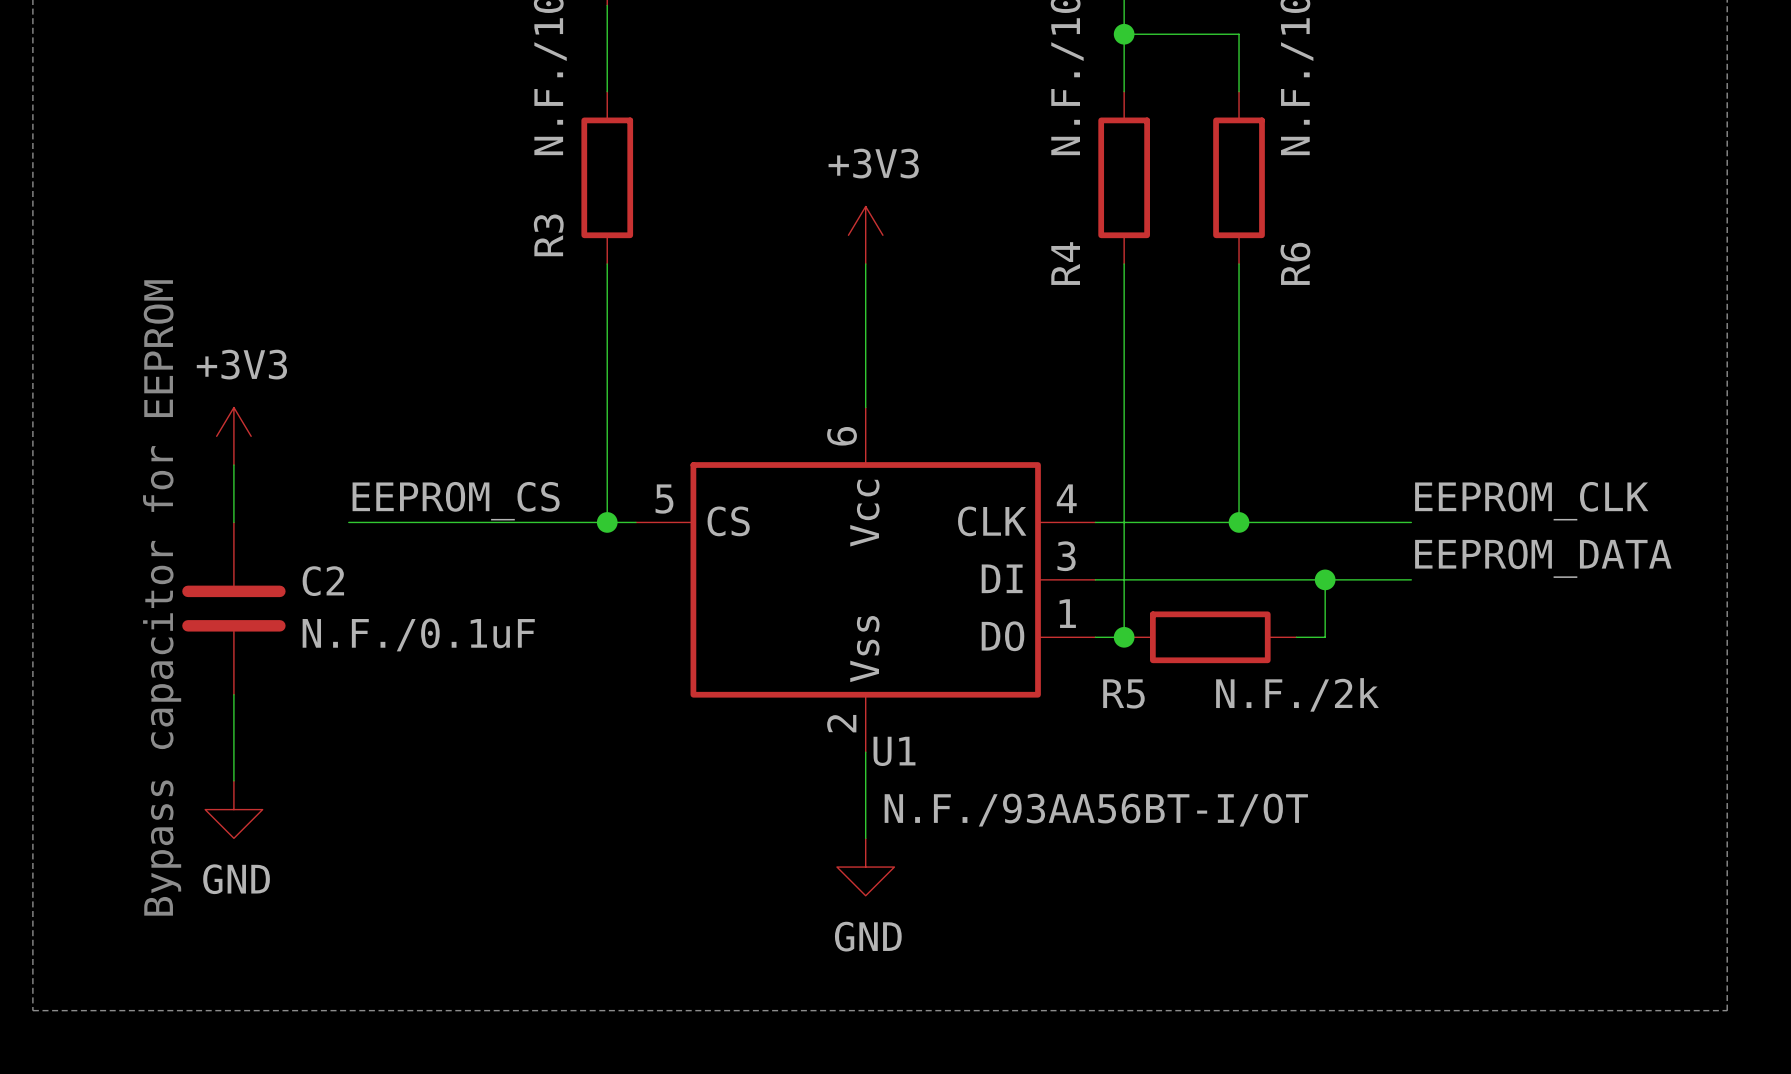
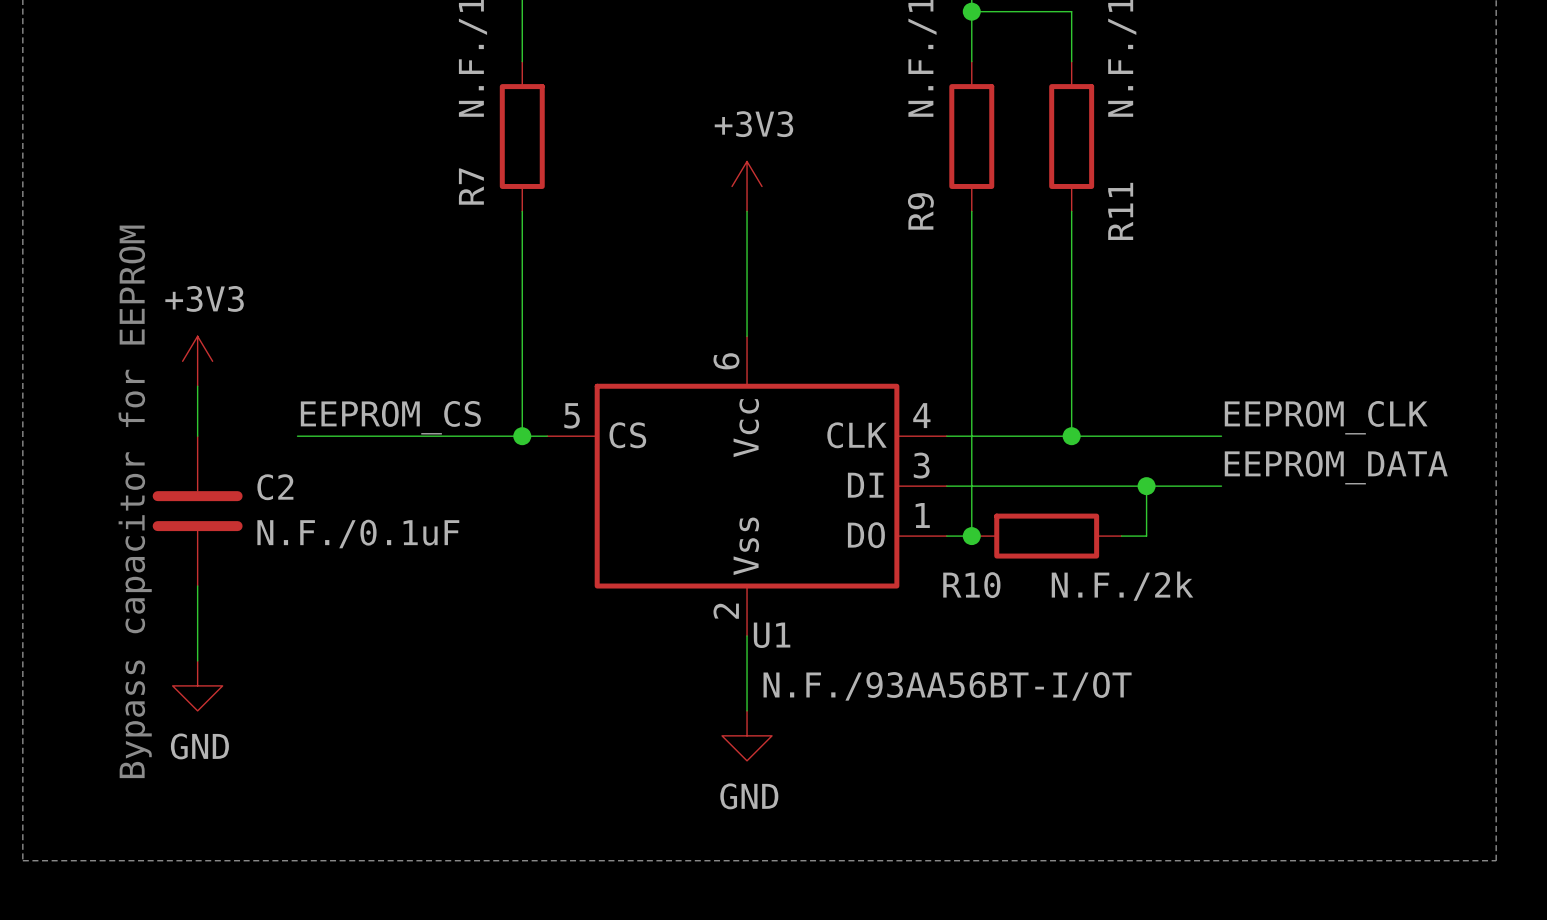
R3 name: R3 (548, 235) -> R7 (471, 186)
R4 name: R4 (1065, 263) -> R9 (920, 211)
R6 name: R6 (1295, 263) -> R11 (1120, 211)
R5 name: R5 (1123, 693) -> R10 (971, 585)

